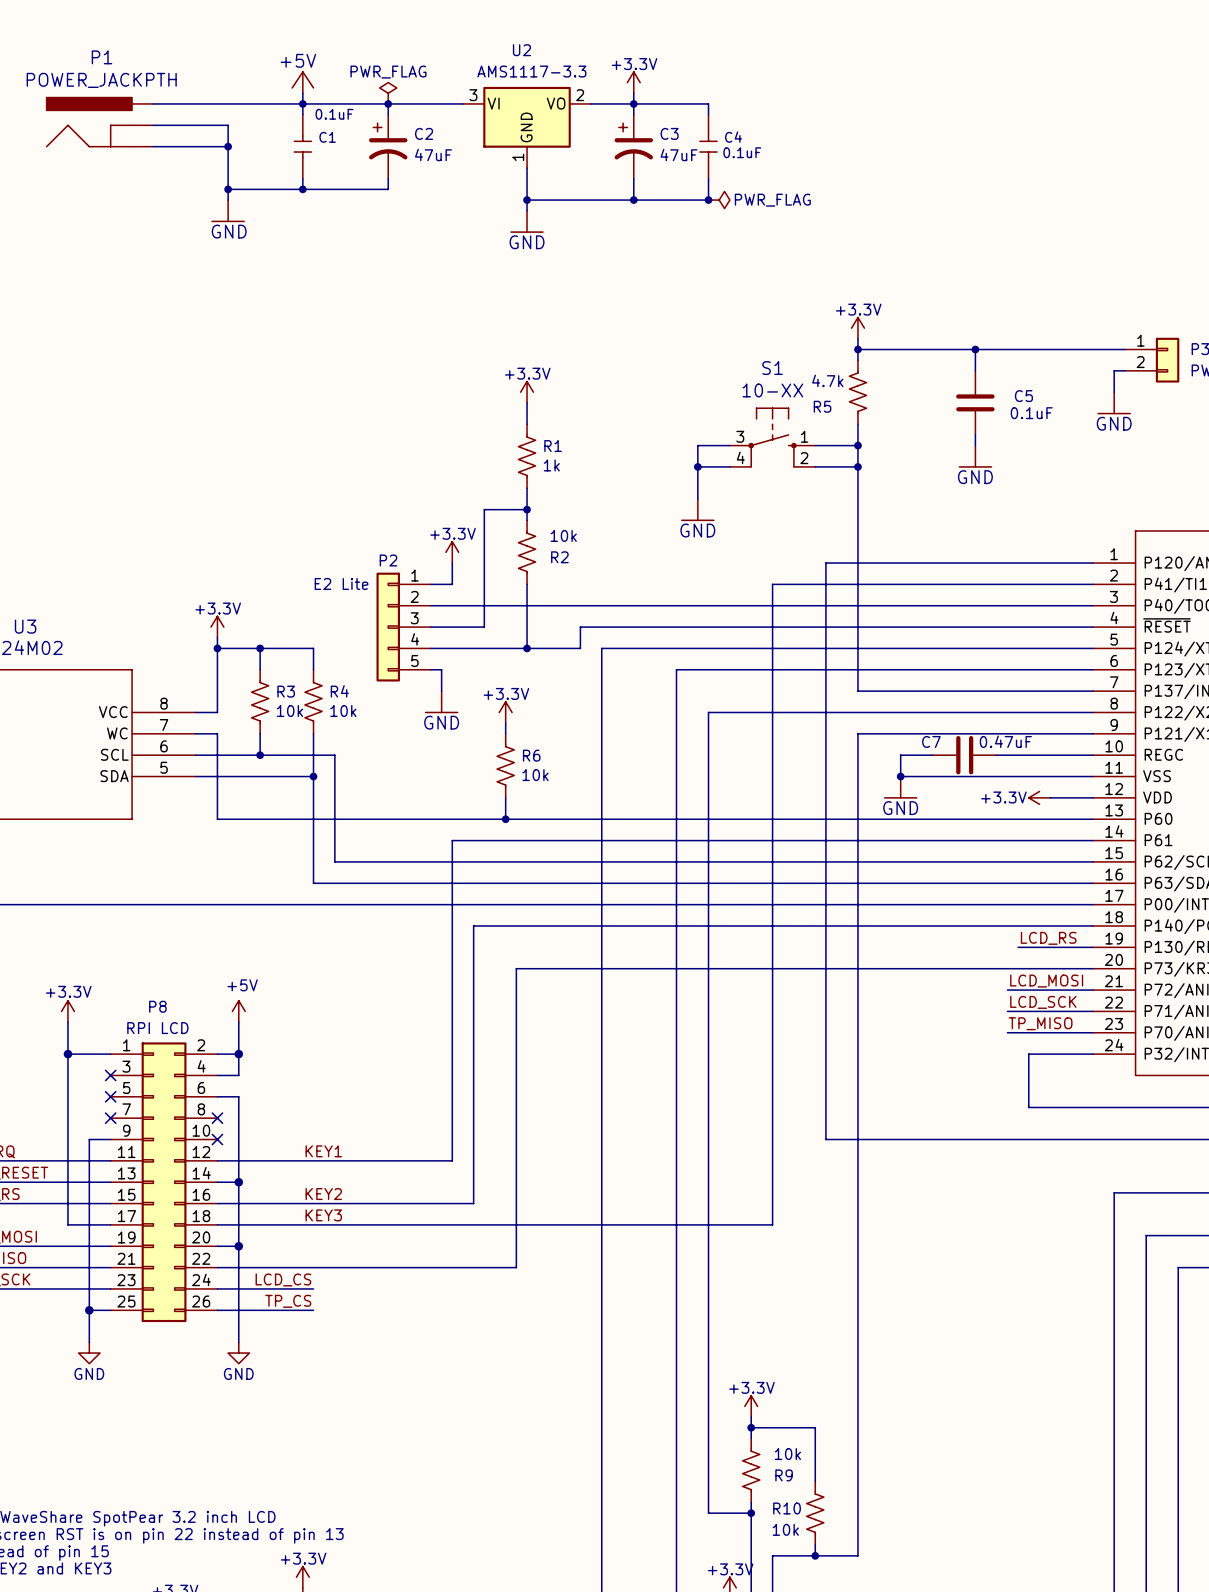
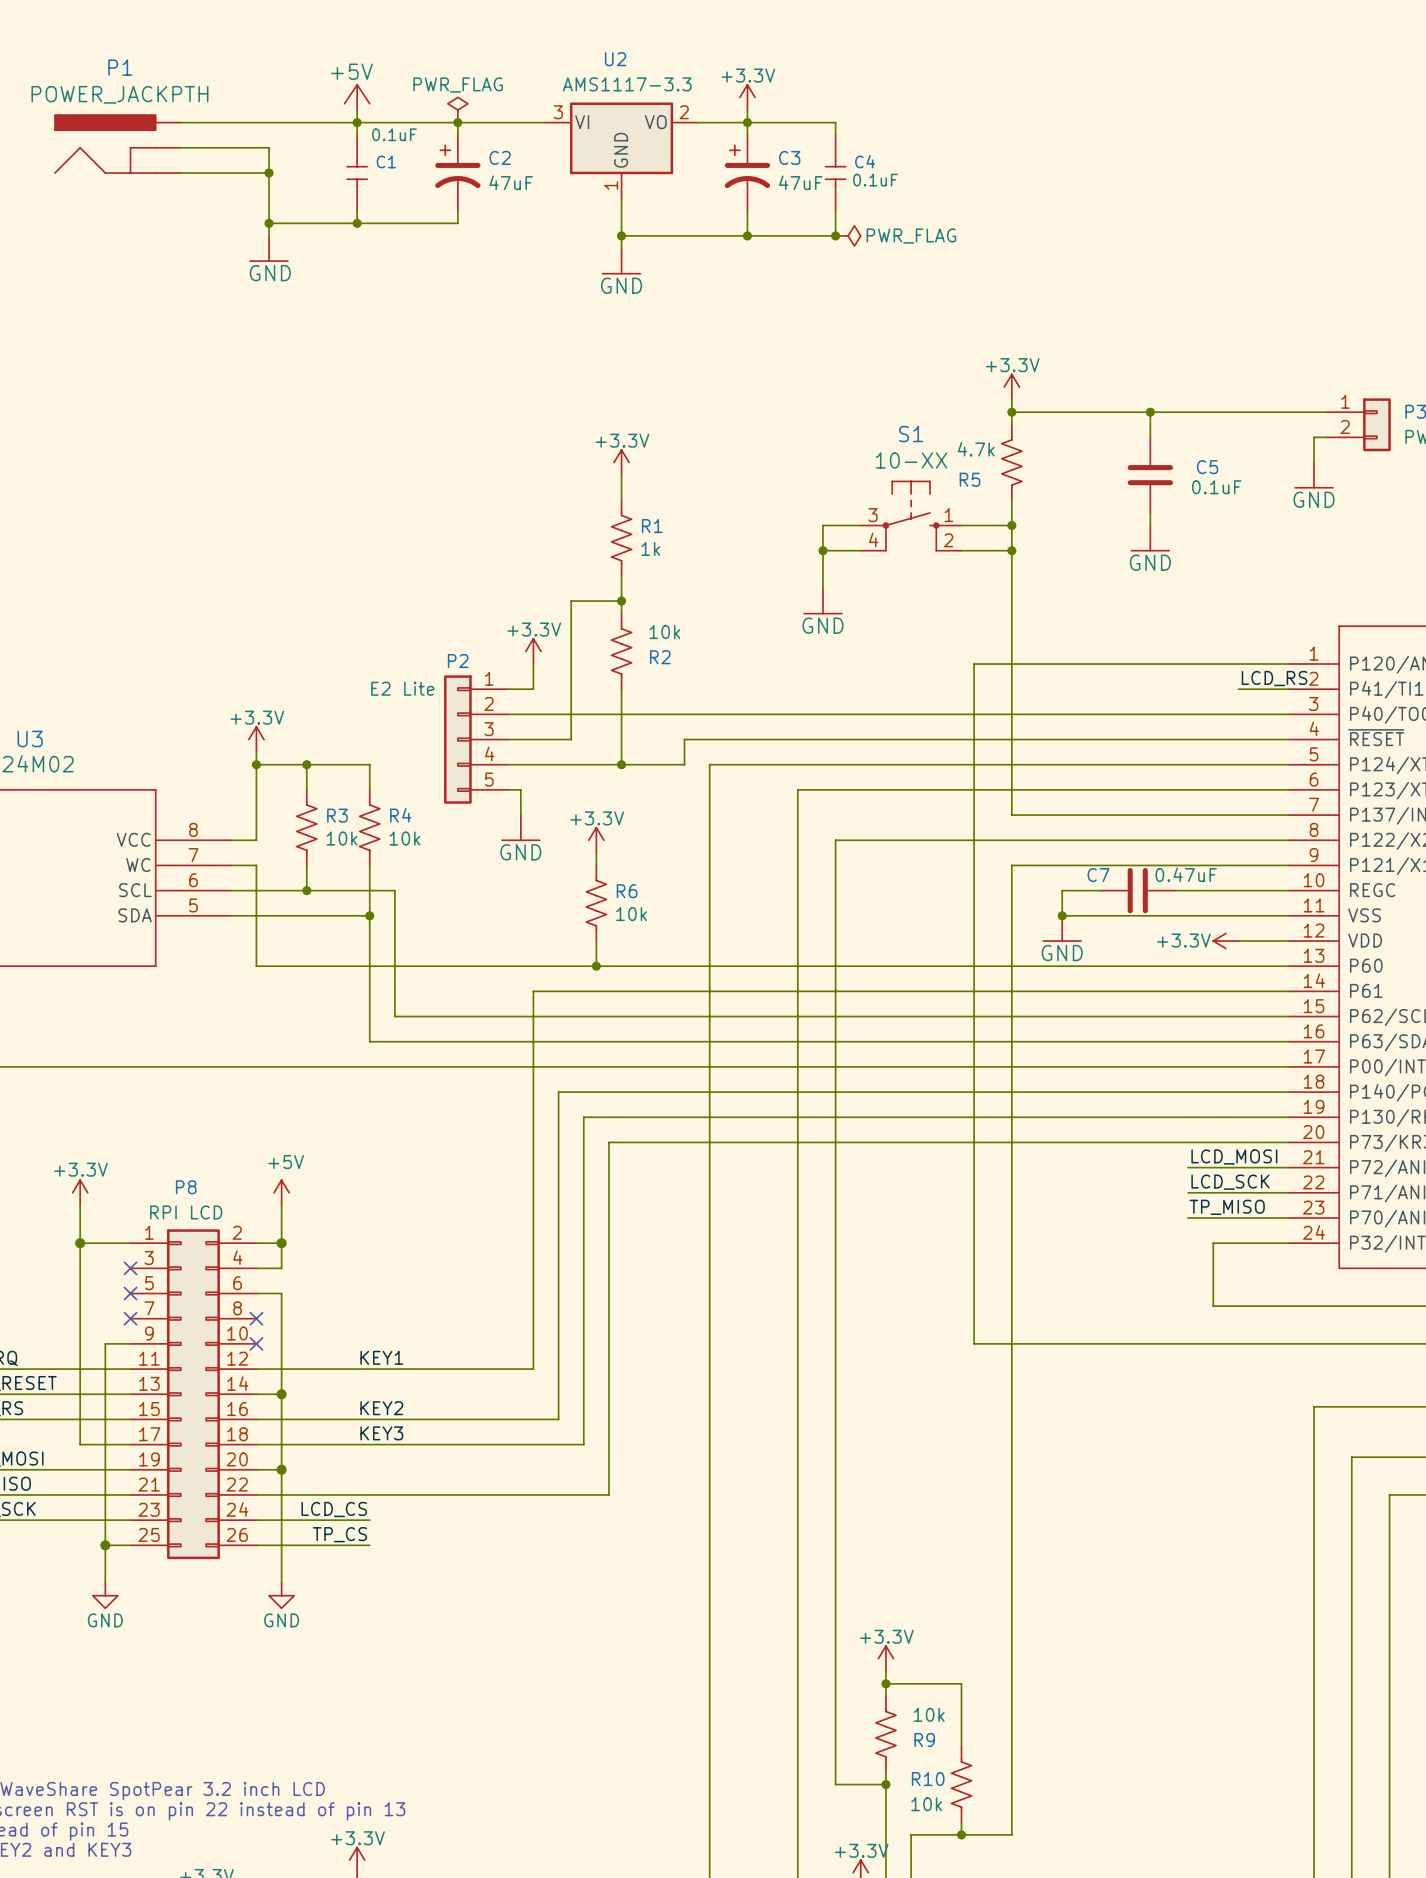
label: none -> LCD_RS (1274, 678)
wire: (1050, 584) (772, 584) (772, 1224) (495, 1224) -> (1200, 1117) (583, 1117) (583, 1444)
label: LCD_RS (1048, 938) -> none

